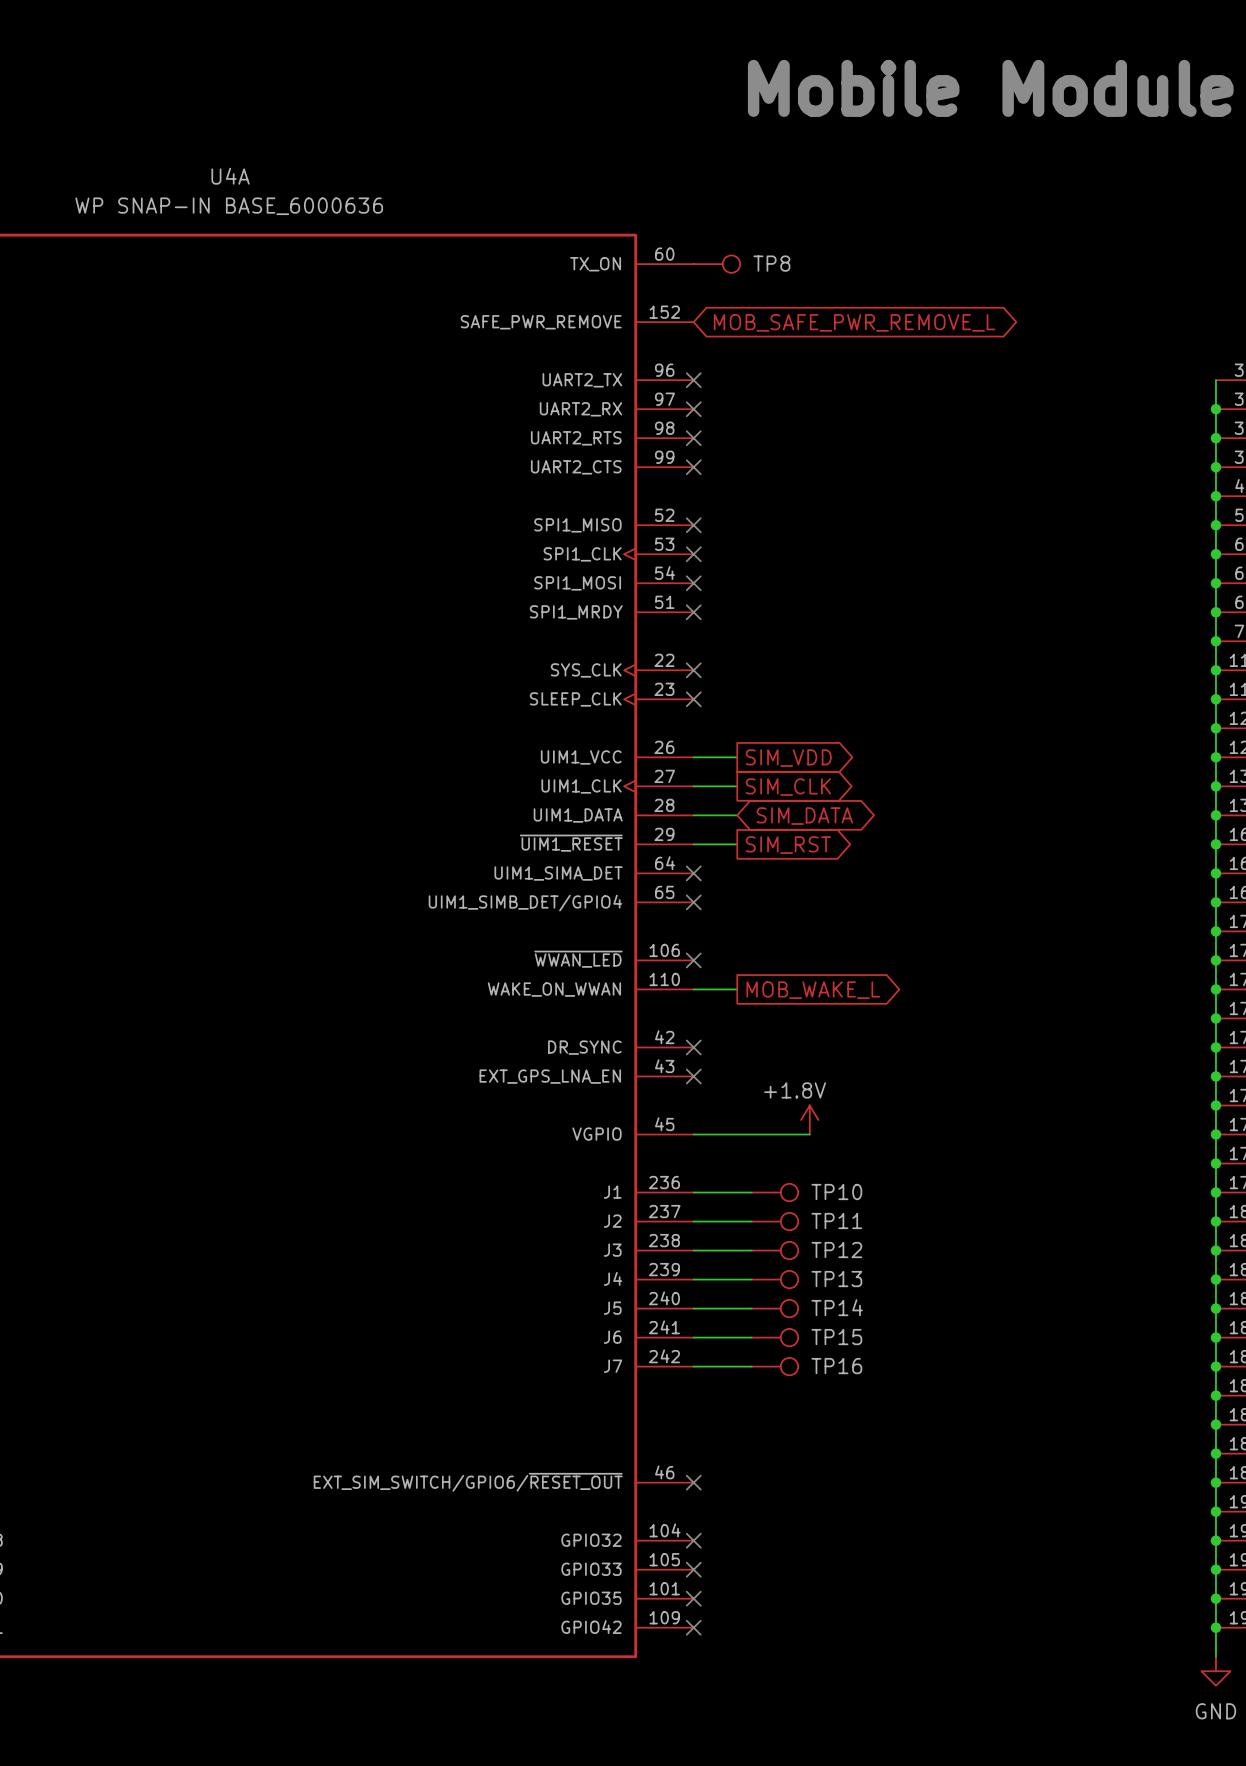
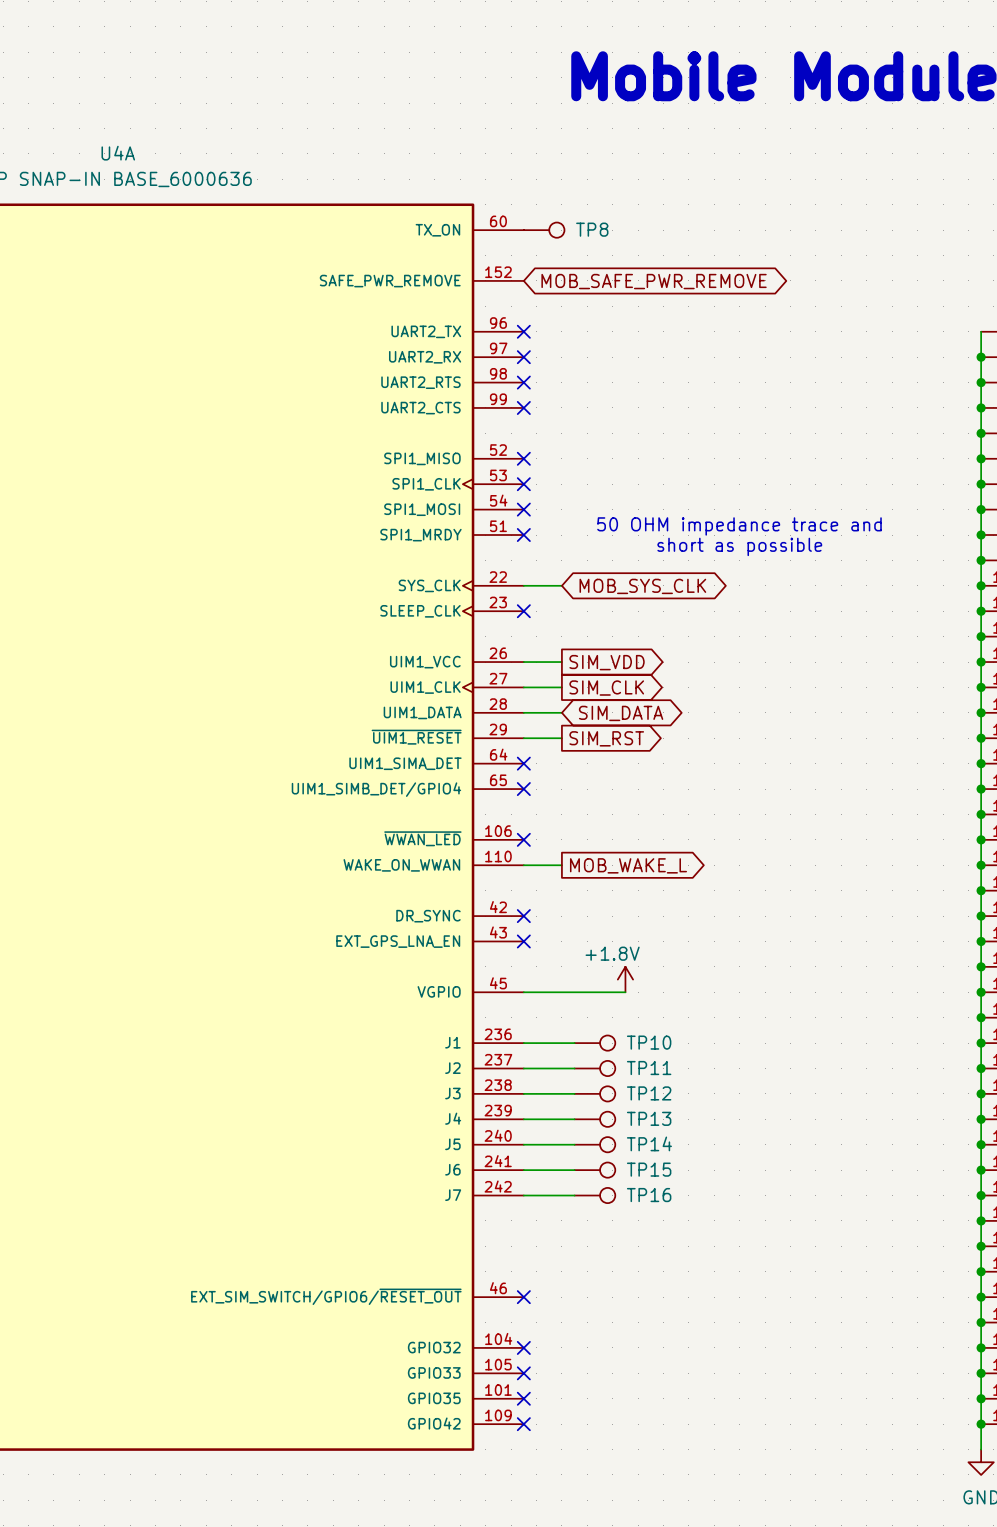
global label: MOB_SAFE_PWR_REMOVE_L (854, 322) -> MOB_SAFE_PWR_REMOVE (654, 281)
text: none -> 50 OHM impedance trace and (739, 526)
text: none -> short as possible (739, 546)
wire: none -> (523, 585) (561, 585)
no-connect mark: (693, 670) -> none
global label: none -> MOB_SYS_CLK (642, 586)

